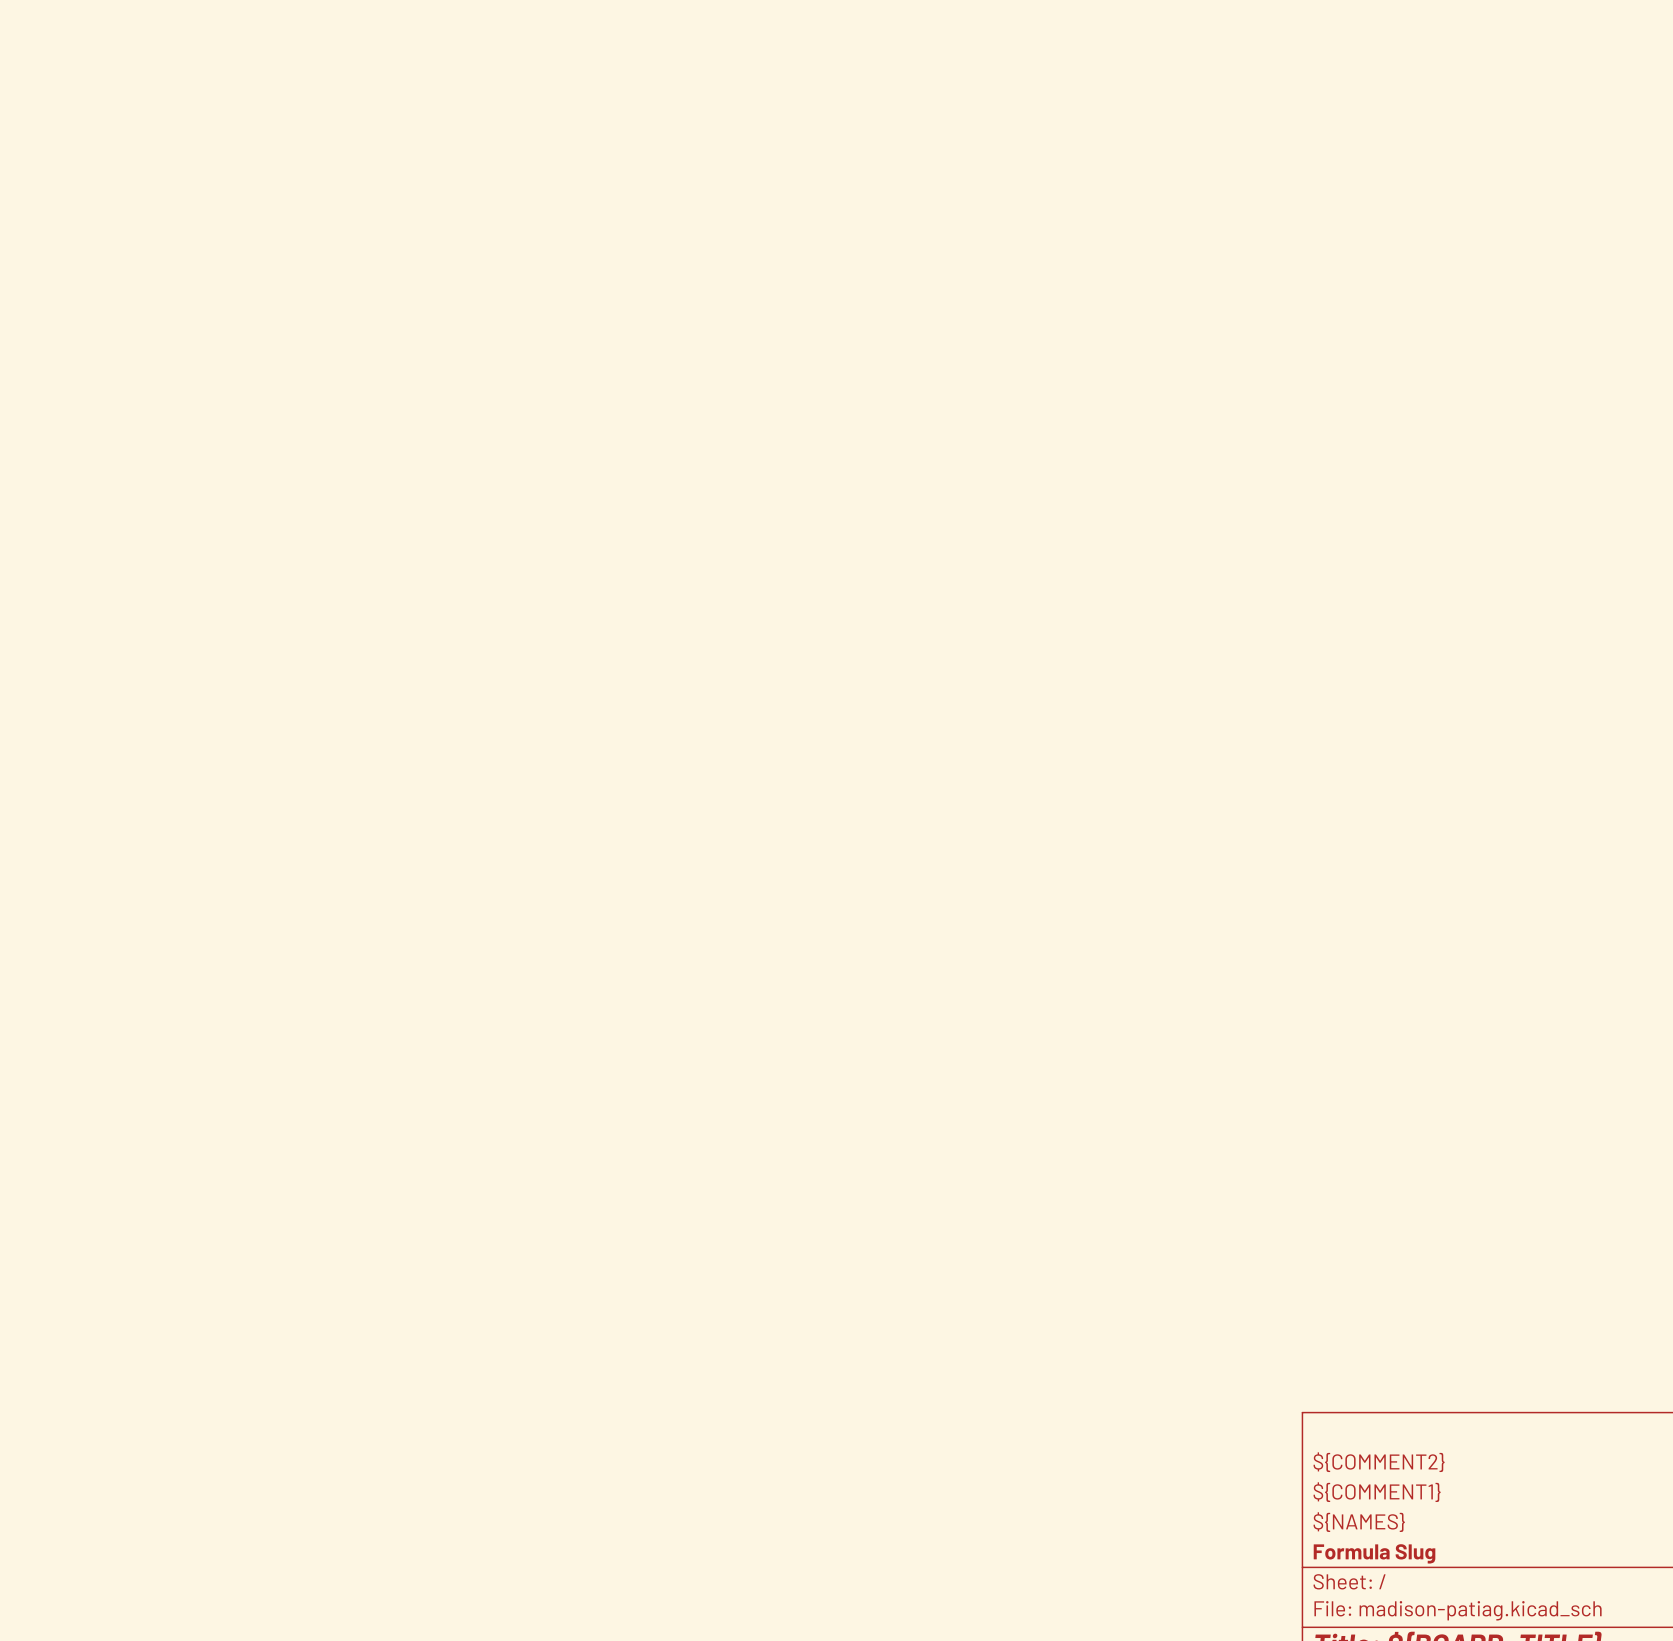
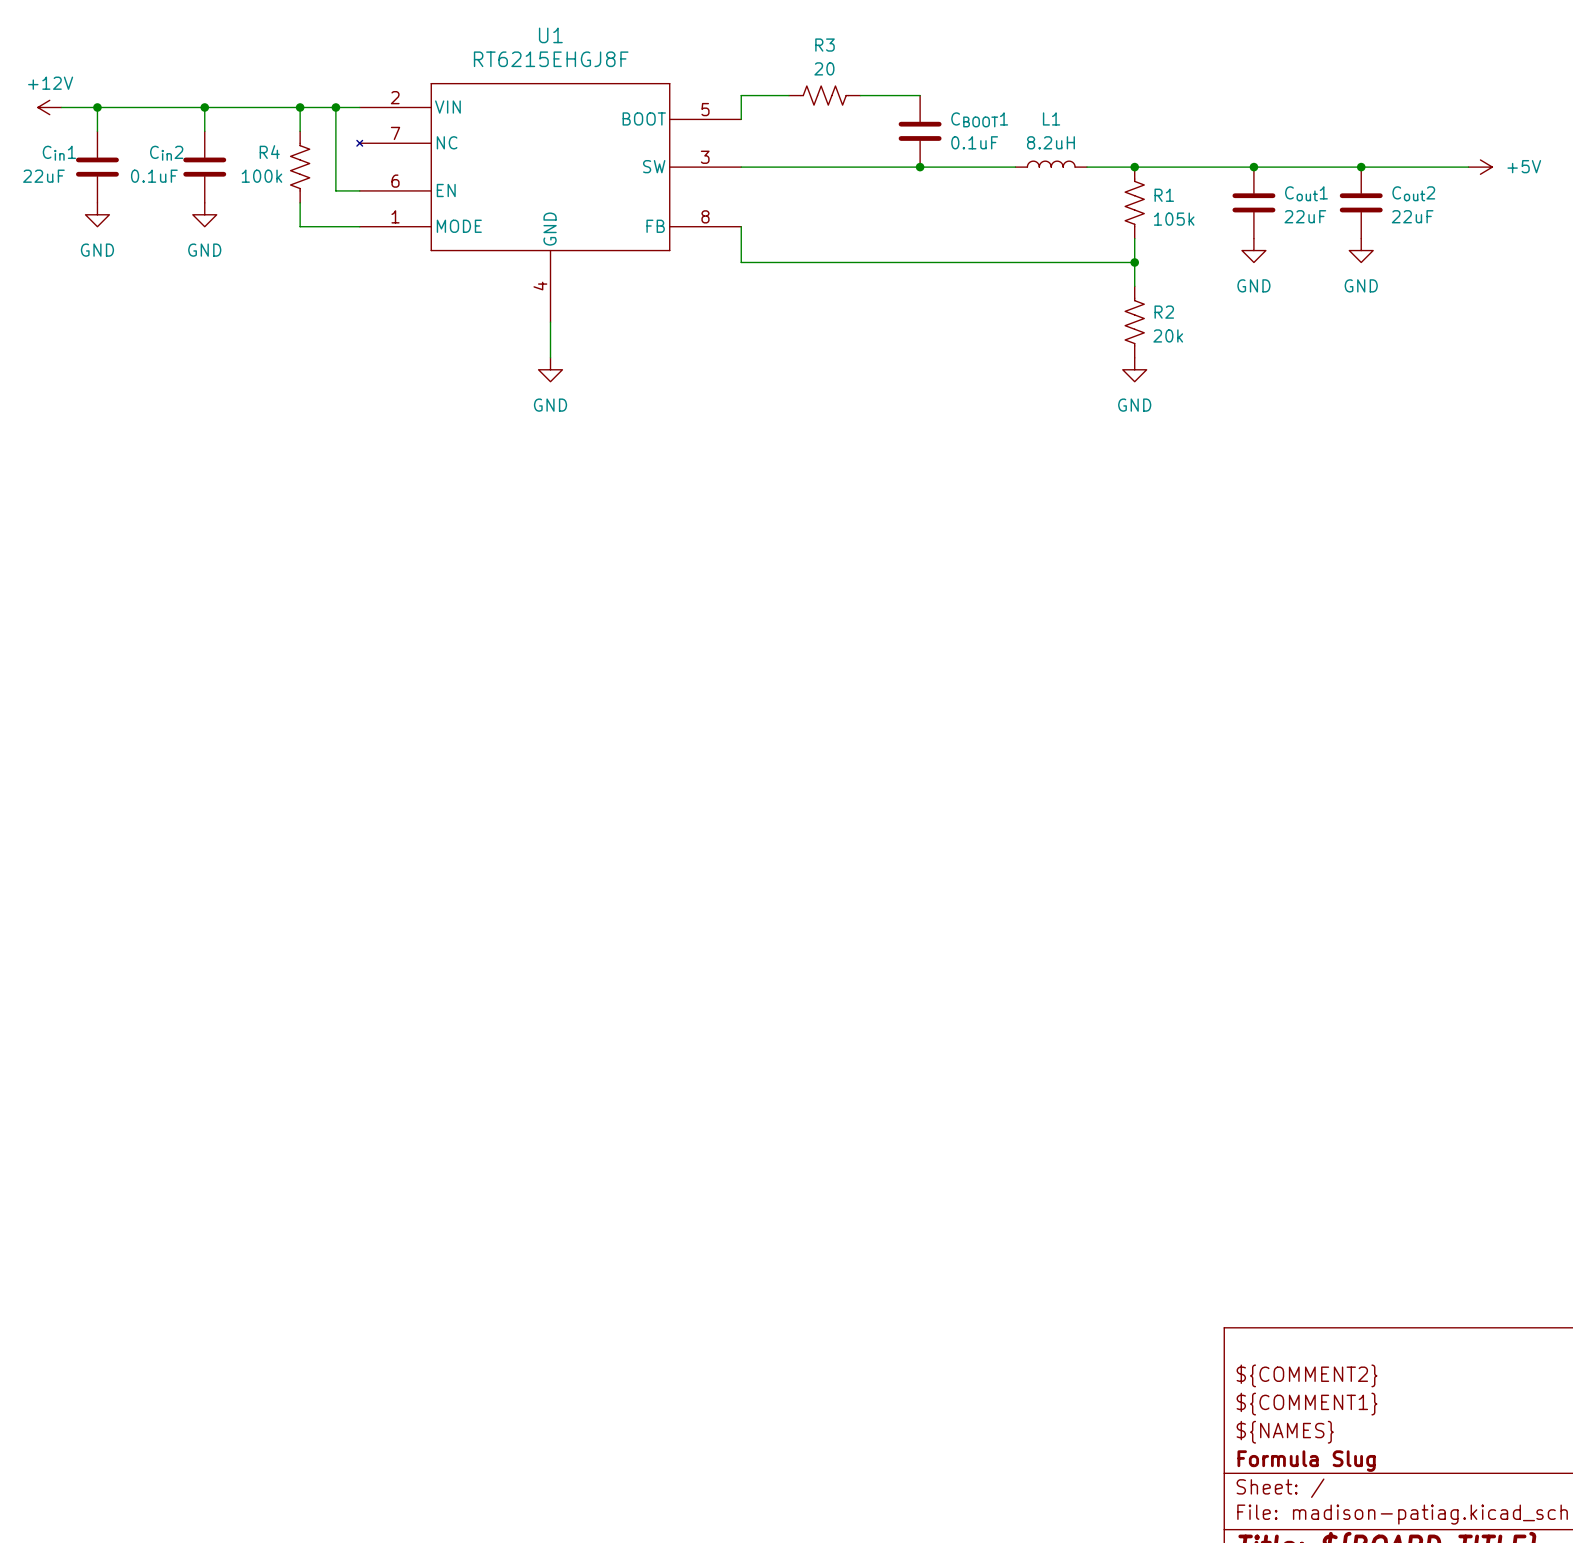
wire: none -> (788, 95) (741, 95) (741, 119)
R3: none -> 20 (824, 95)
wire: none -> (860, 95) (920, 95)
power symbol: none -> +12V (49, 107)
wire: none -> (61, 107) (359, 107)
wire: none -> (97, 107) (97, 131)
junction: none -> (97, 107)
wire: none -> (204, 107) (204, 131)
junction: none -> (204, 107)
wire: none -> (300, 107) (300, 131)
junction: none -> (300, 107)
wire: none -> (335, 107) (335, 190) (359, 190)
junction: none -> (335, 107)
CBOOT1: none -> 0.1uF (920, 131)
L1: none -> 8.2uH (1051, 164)
Cin1: none -> 22uF (97, 167)
Cin2: none -> 0.1uF (204, 167)
R4: none -> 100k (300, 167)
wire: none -> (741, 167) (1015, 167)
junction: none -> (920, 167)
wire: none -> (1087, 167) (1468, 167)
junction: none -> (1134, 167)
junction: none -> (1253, 167)
junction: none -> (1361, 167)
power symbol: none -> +5V (1480, 167)
wire: none -> (300, 202) (300, 226) (359, 226)
U1: none -> RT6215EHGJ8F (549, 202)
R1: none -> 105k (1134, 202)
Cout1: none -> 22uF (1253, 202)
Cout2: none -> 22uF (1361, 202)
power symbol: none -> GND (97, 214)
power symbol: none -> GND (204, 214)
wire: none -> (741, 226) (741, 262) (1134, 262)
wire: none -> (1134, 238) (1134, 286)
power symbol: none -> GND (1253, 250)
power symbol: none -> GND (1361, 250)
junction: none -> (1134, 262)
wire: none -> (550, 322) (550, 357)
R2: none -> 20k (1134, 322)
power symbol: none -> GND (550, 369)
power symbol: none -> GND (1134, 369)

